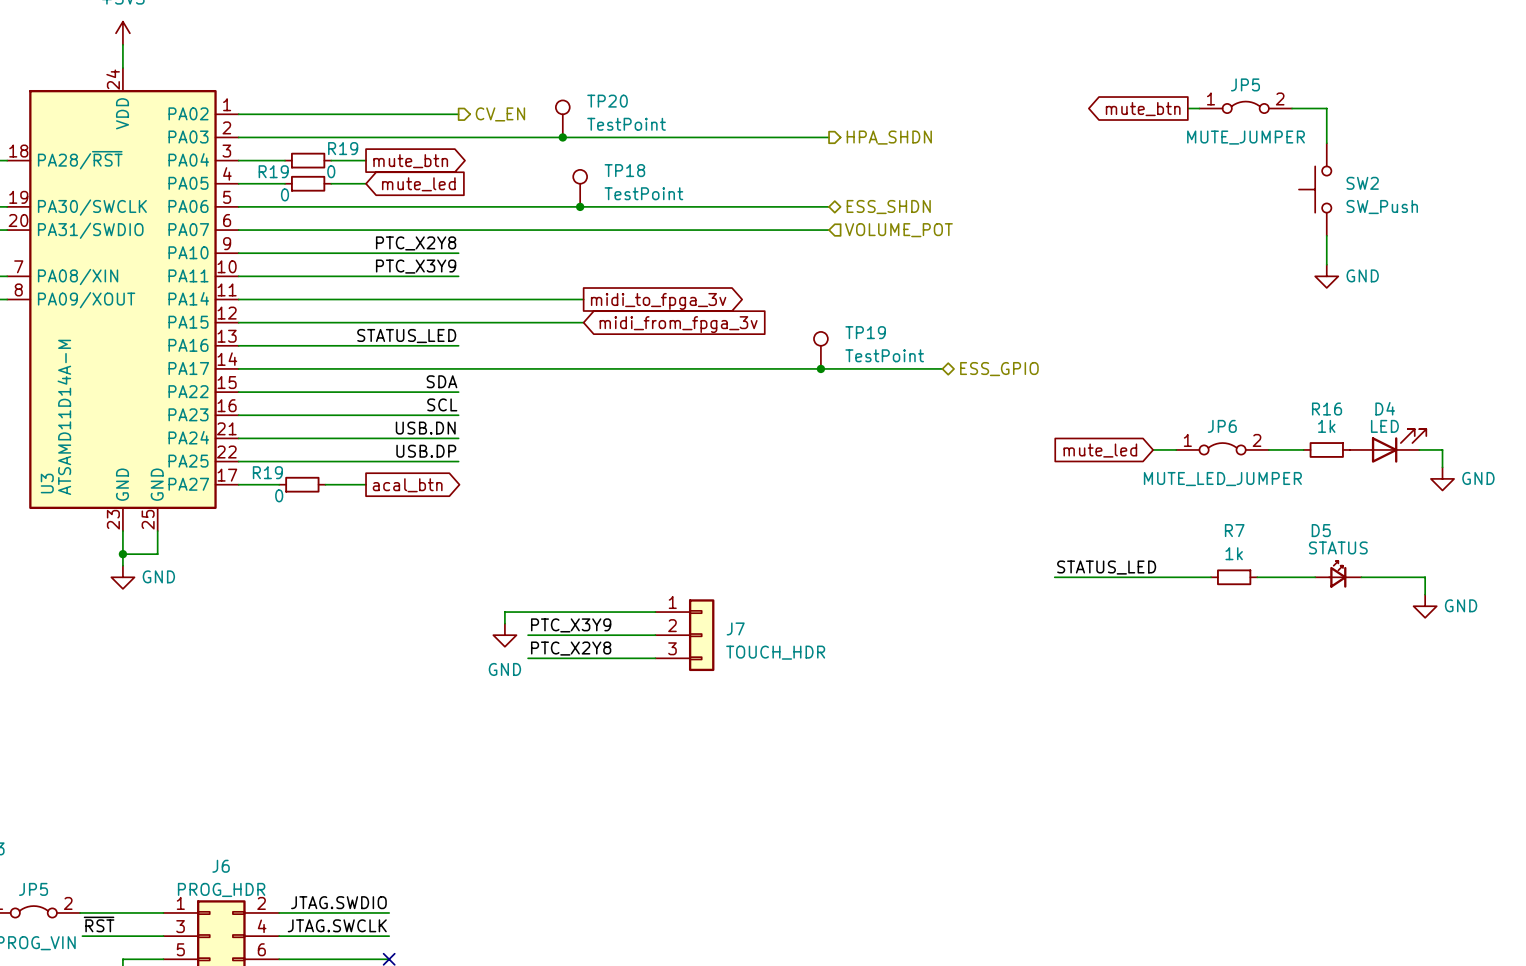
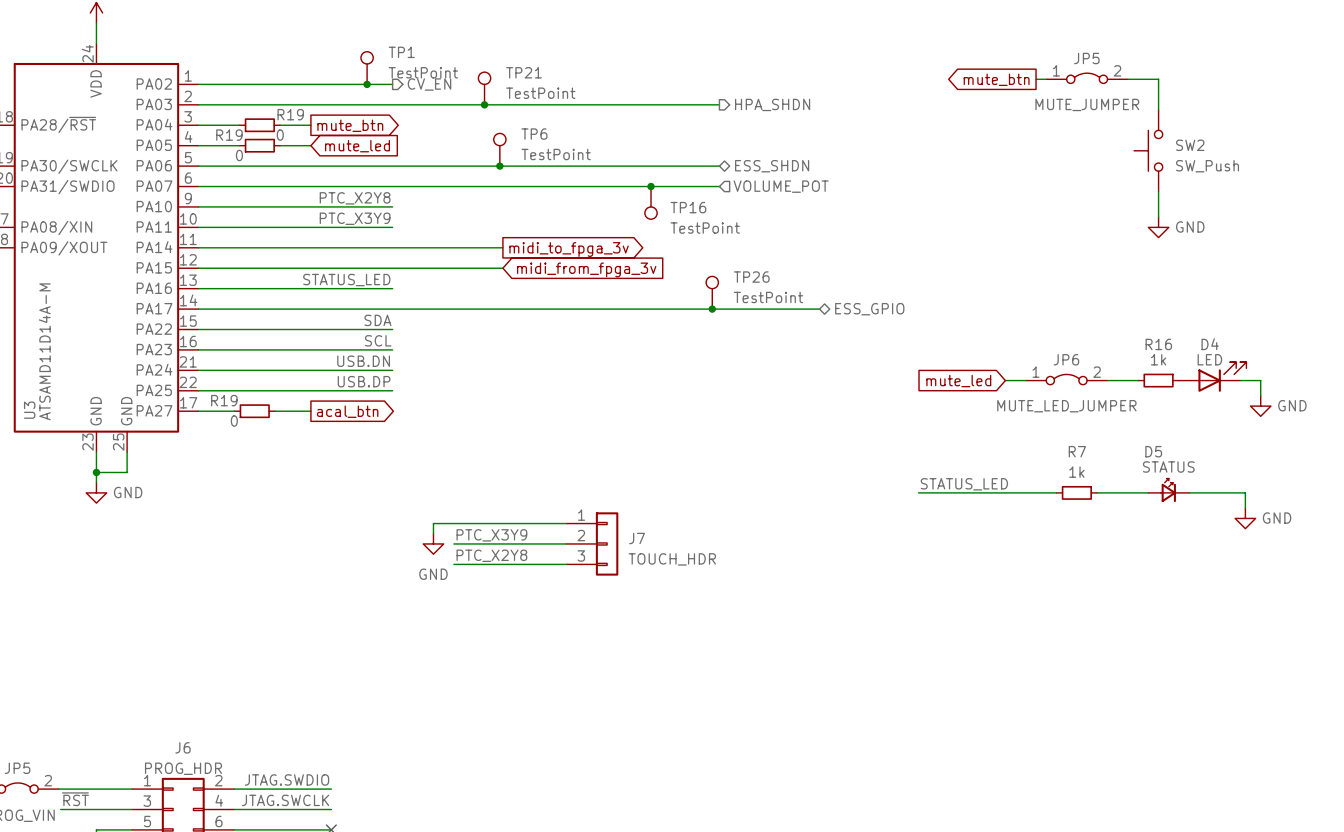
TP1: none -> TestPoint (367, 68)
TP20 name: TP20 (607, 101) -> TP21 (524, 72)
junction: none -> (367, 84)
TP18 name: TP18 (624, 170) -> TP6 (534, 134)
junction: none -> (651, 186)
TP16: none -> TestPoint (651, 202)
TP19 name: TP19 (865, 332) -> TP26 (751, 277)

